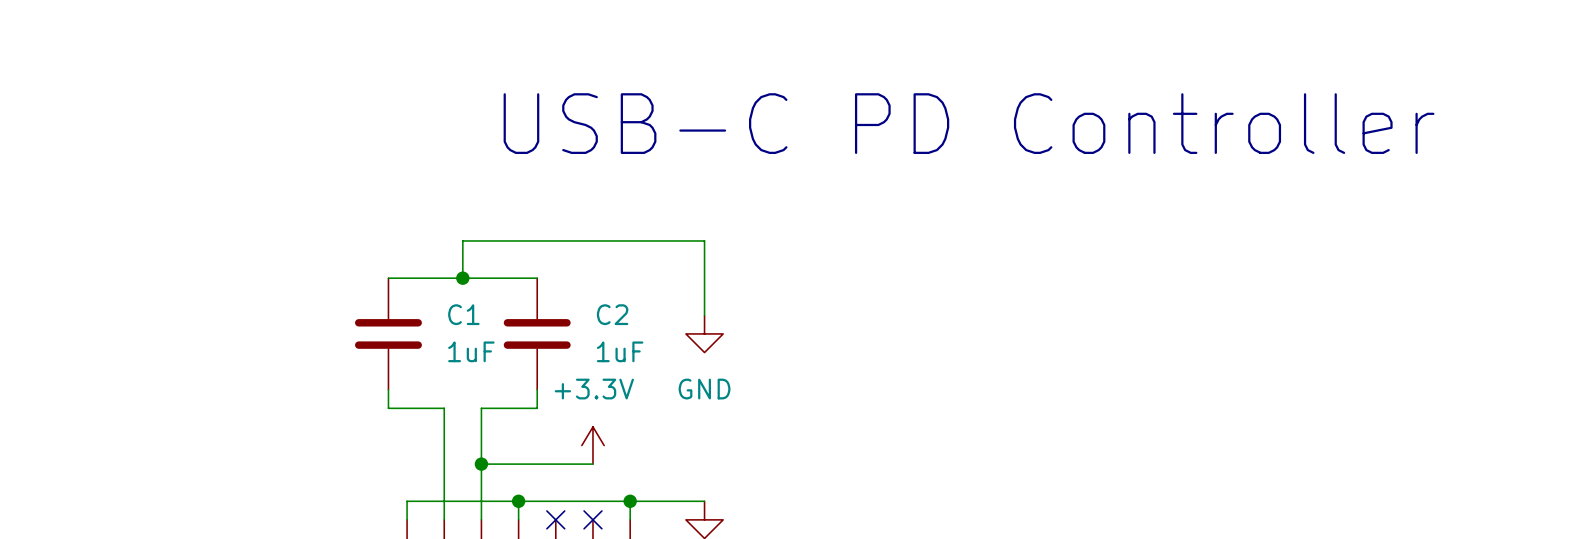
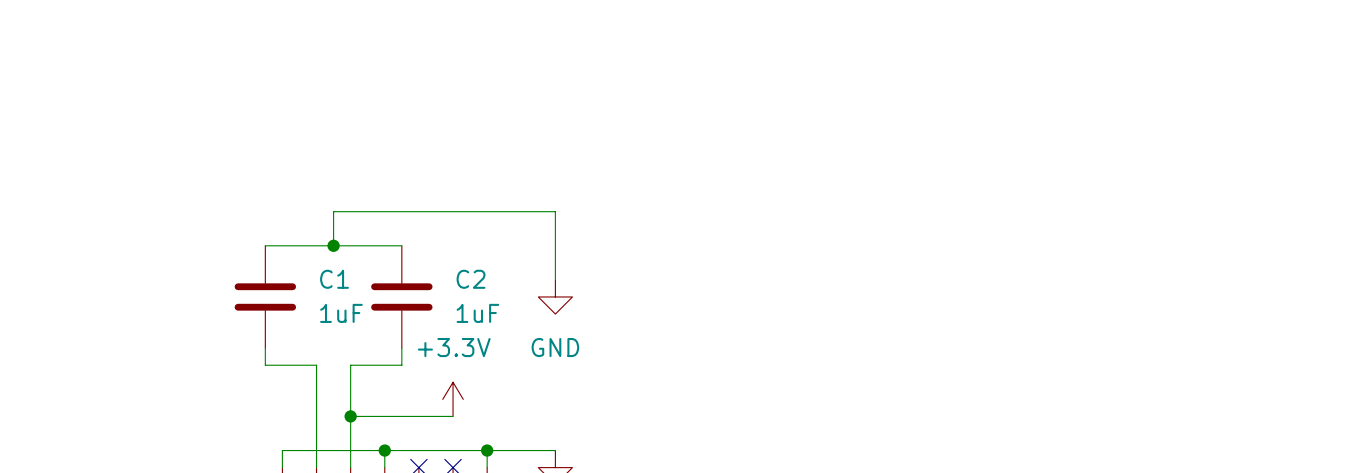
text: USB-C PD Controller (969, 123) -> none

